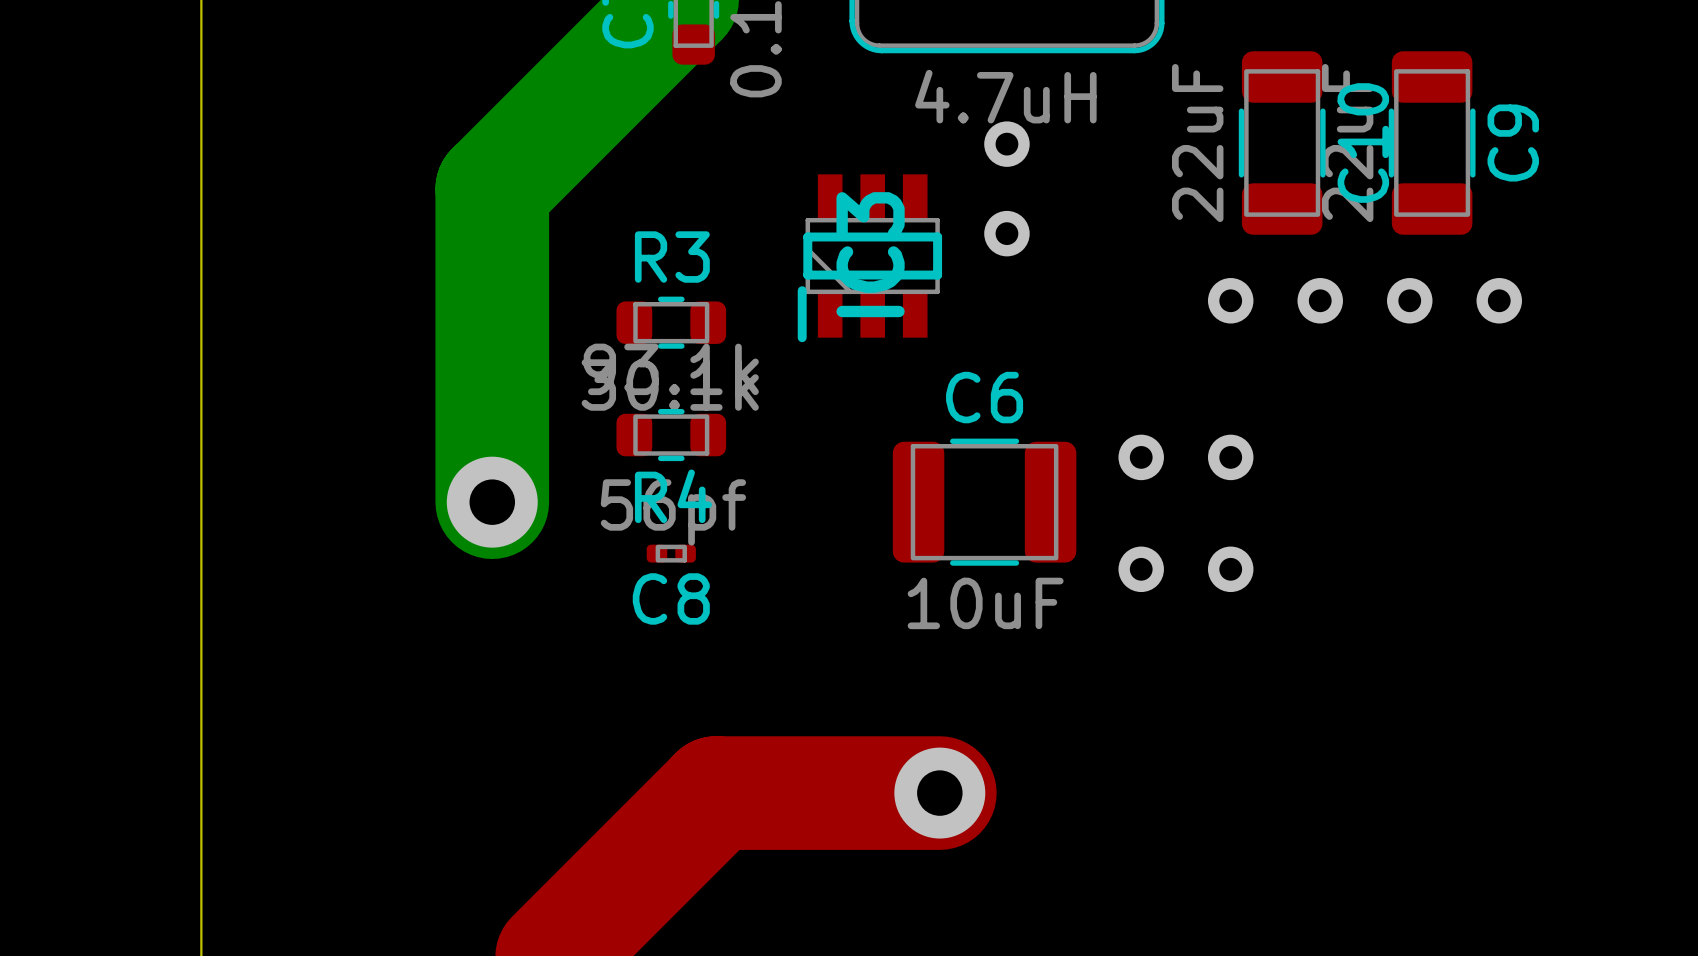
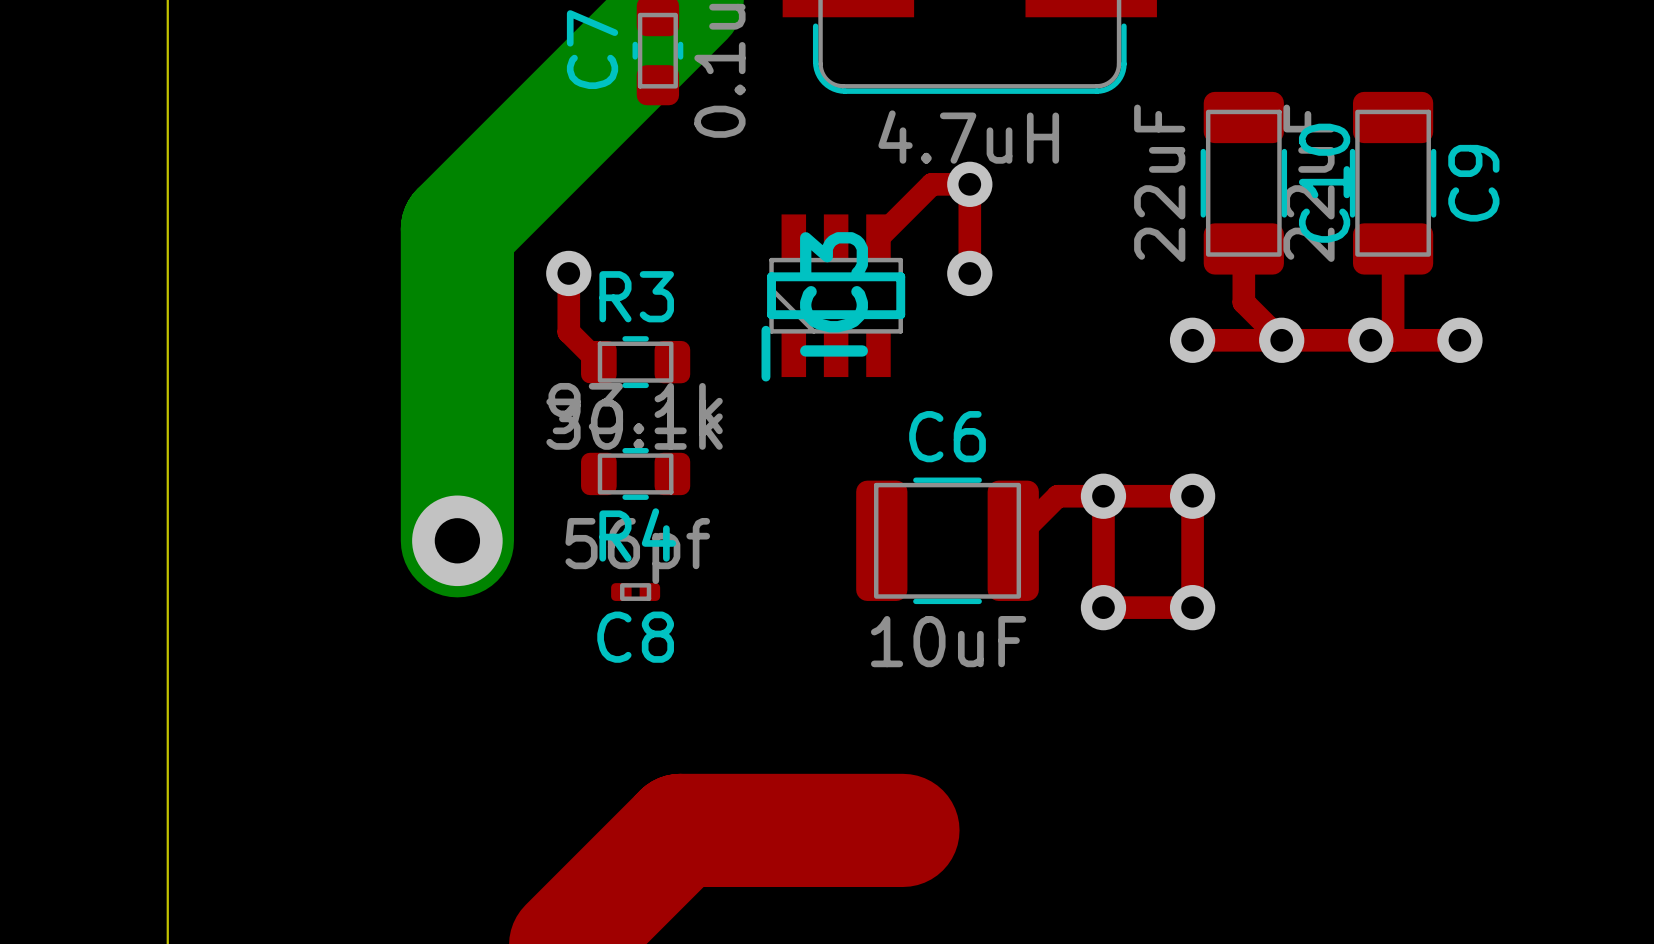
top track: none -> (878, 237) (931, 184) (969, 184) (969, 273)
top track: none -> (1243, 248) (1243, 302) (1281, 340)
top track: none -> (1393, 248) (1393, 340)
top track: none -> (568, 273) (568, 332) (598, 362)
via: none -> (568, 273)
top track: none -> (1192, 340) (1459, 340)
top track: none -> (1103, 496) (1103, 607) (1192, 607) (1192, 496) (1057, 496) (1013, 540)
via: (939, 793) -> none

